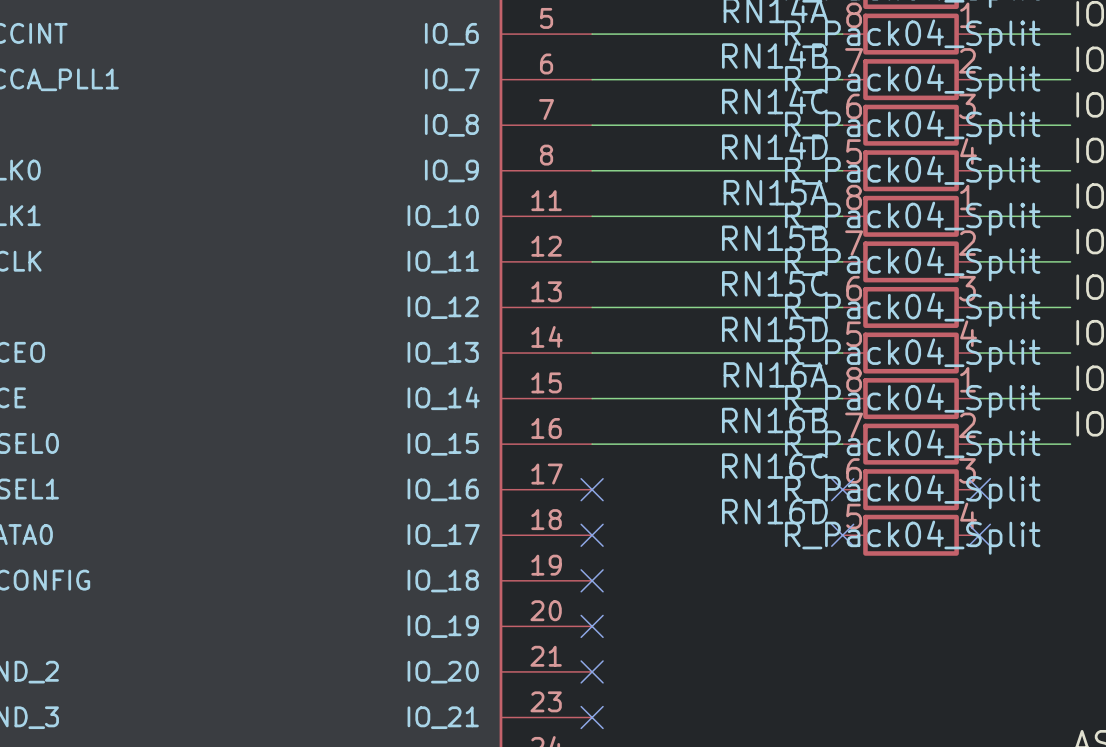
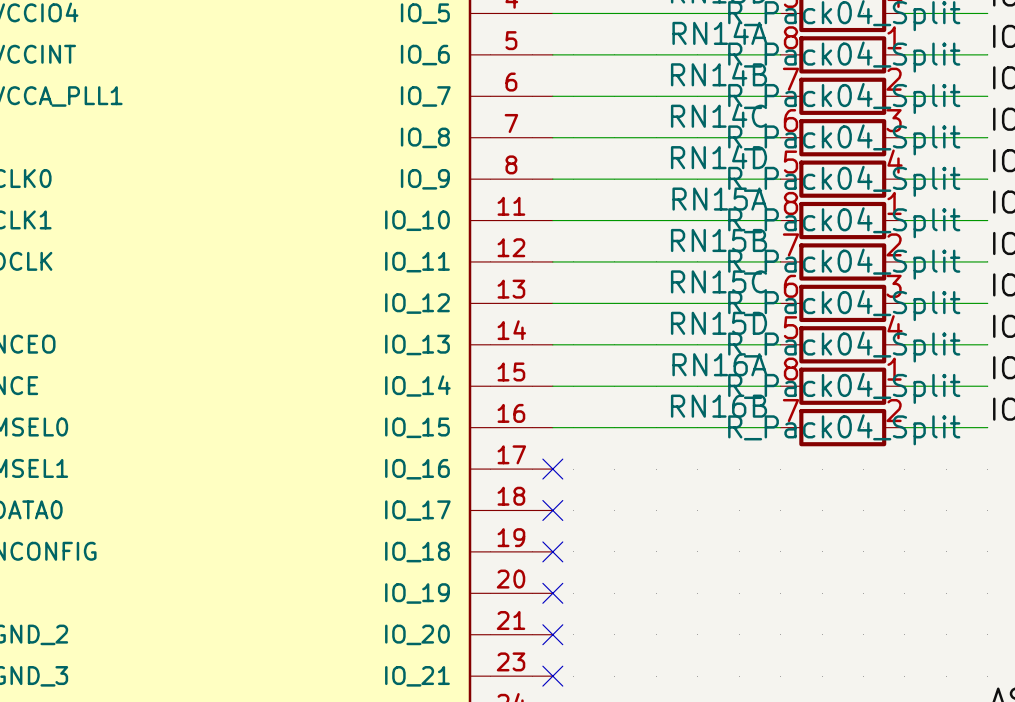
no-connect mark: (842, 489) -> none
RN16C: R_Pack04_Split (911, 489) -> none
no-connect mark: (979, 489) -> none
no-connect mark: (842, 535) -> none
RN16D: R_Pack04_Split (911, 535) -> none
no-connect mark: (979, 535) -> none

